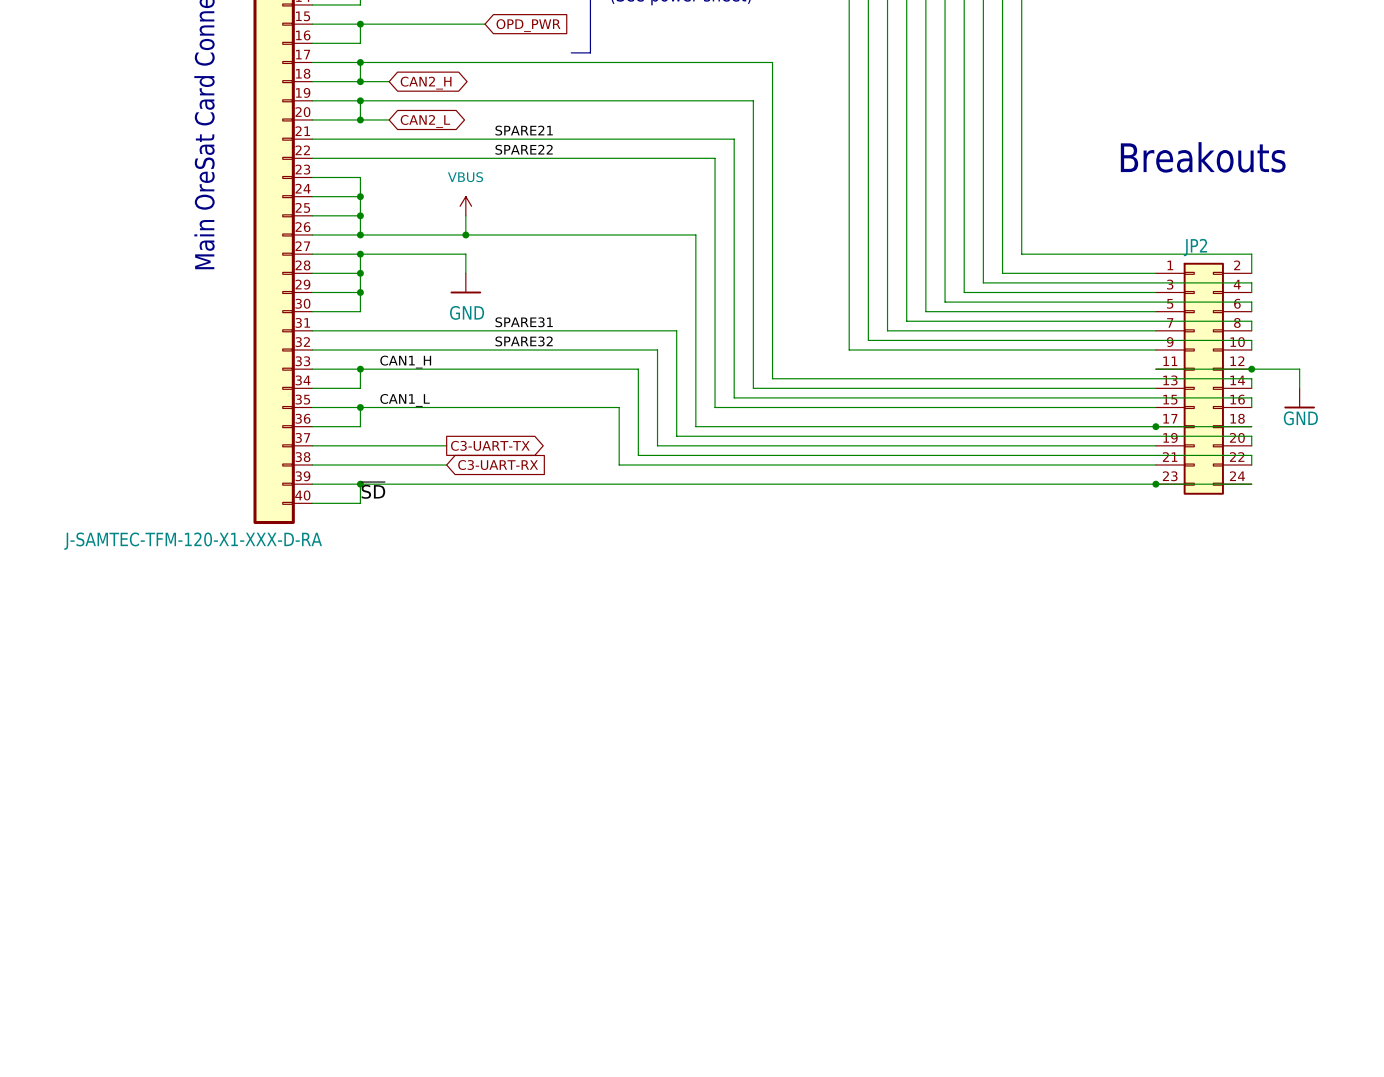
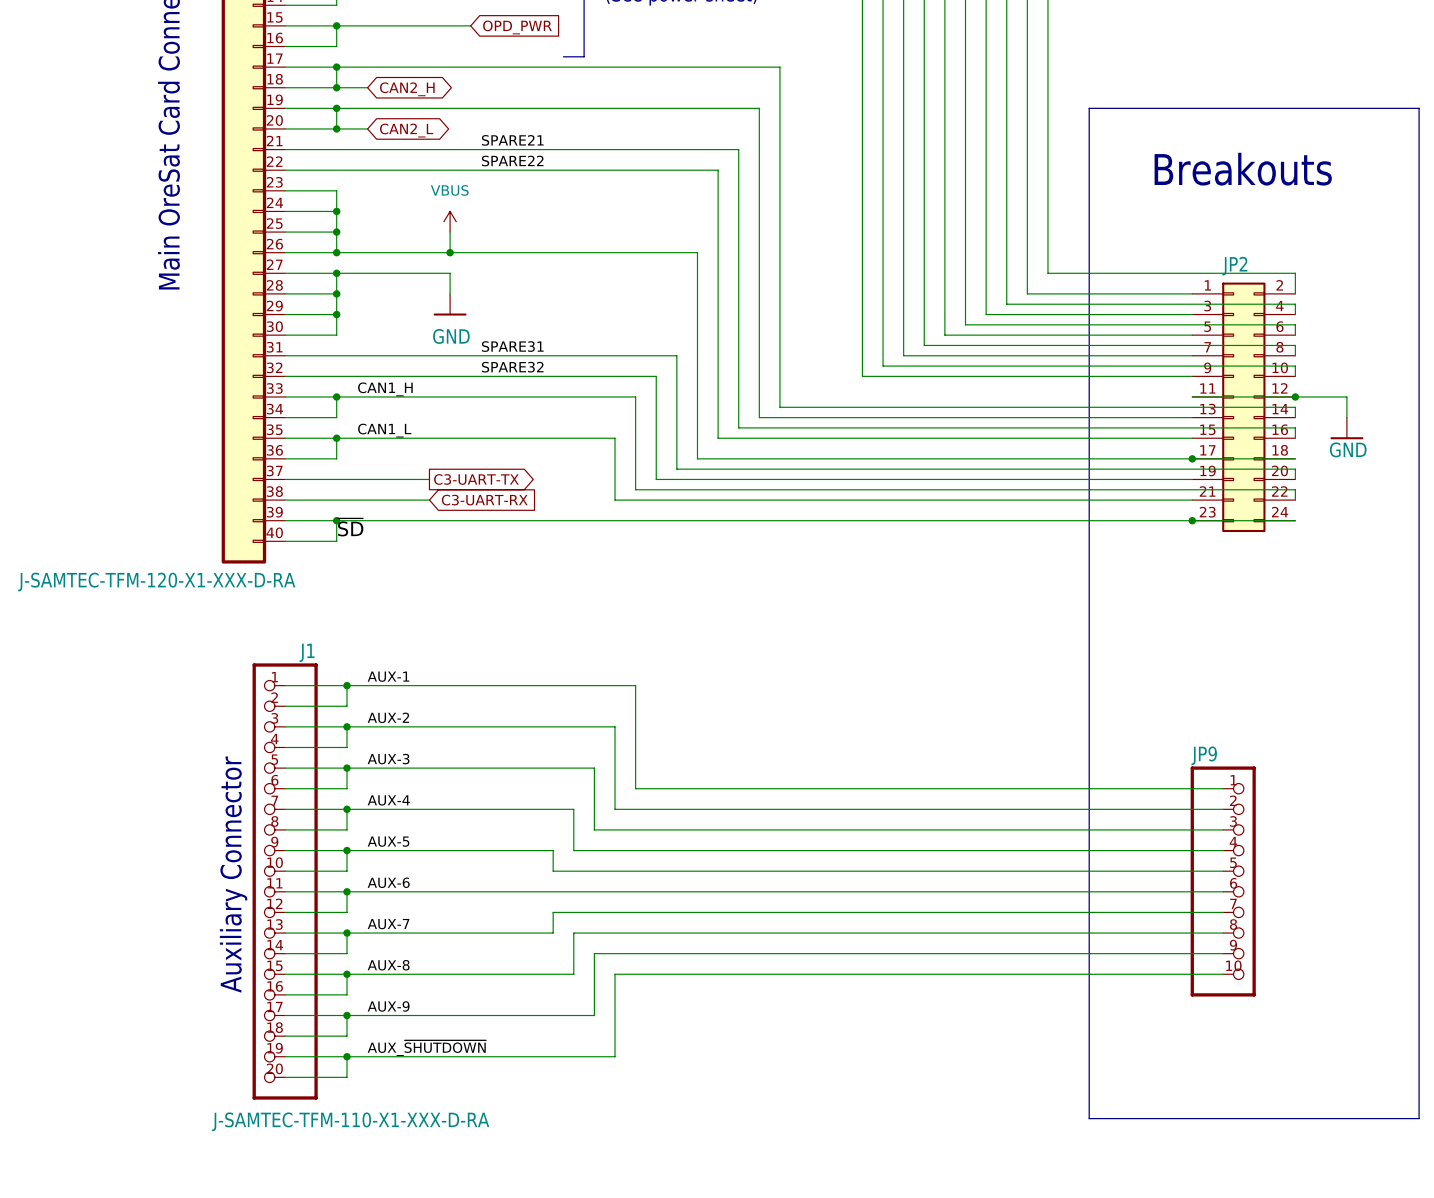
line: none -> (1089, 108) (1089, 1118) (1419, 1118) (1419, 108) (1089, 108)
label: none -> AUX-1 (388, 676)
wire: none -> (285, 685) (635, 685) (635, 788) (1223, 788)
wire: none -> (346, 685) (346, 706) (285, 706)
junction: none -> (346, 685)
label: none -> AUX-2 (388, 717)
wire: none -> (285, 726) (615, 726) (615, 809) (1223, 809)
wire: none -> (346, 726) (346, 747) (285, 747)
junction: none -> (346, 726)
label: none -> AUX-3 (388, 759)
wire: none -> (285, 768) (594, 768) (594, 829) (1223, 829)
wire: none -> (346, 768) (346, 788) (285, 788)
junction: none -> (346, 768)
label: none -> AUX-4 (388, 800)
wire: none -> (285, 809) (573, 809) (573, 850) (1223, 850)
wire: none -> (346, 809) (346, 829) (285, 829)
junction: none -> (346, 809)
label: none -> AUX-5 (388, 841)
wire: none -> (285, 850) (553, 850) (553, 871) (1223, 871)
wire: none -> (346, 850) (346, 871) (285, 871)
junction: none -> (346, 850)
text: none -> Auxiliary Connector (233, 874)
J1: none -> J-SAMTEC-TFM-110-X1-XXX-D-RA (285, 881)
JP9: none -> (1223, 881)
label: none -> AUX-6 (388, 882)
wire: none -> (285, 891) (1223, 891)
wire: none -> (346, 891) (346, 912) (285, 912)
junction: none -> (346, 891)
wire: none -> (1223, 912) (553, 912) (553, 933) (285, 933)
label: none -> AUX-7 (388, 924)
wire: none -> (346, 933) (346, 953) (285, 953)
junction: none -> (346, 933)
wire: none -> (1223, 933) (573, 933) (573, 974) (285, 974)
wire: none -> (1223, 953) (594, 953) (594, 1015) (285, 1015)
label: none -> AUX-8 (388, 965)
wire: none -> (346, 974) (346, 994) (285, 994)
junction: none -> (346, 974)
wire: none -> (1223, 974) (615, 974) (615, 1056) (285, 1056)
label: none -> AUX-9 (388, 1006)
wire: none -> (346, 1015) (346, 1036) (285, 1036)
junction: none -> (346, 1015)
label: none -> AUX_~{SHUTDOWN} (426, 1048)
wire: none -> (346, 1056) (346, 1077) (285, 1077)
junction: none -> (346, 1056)

